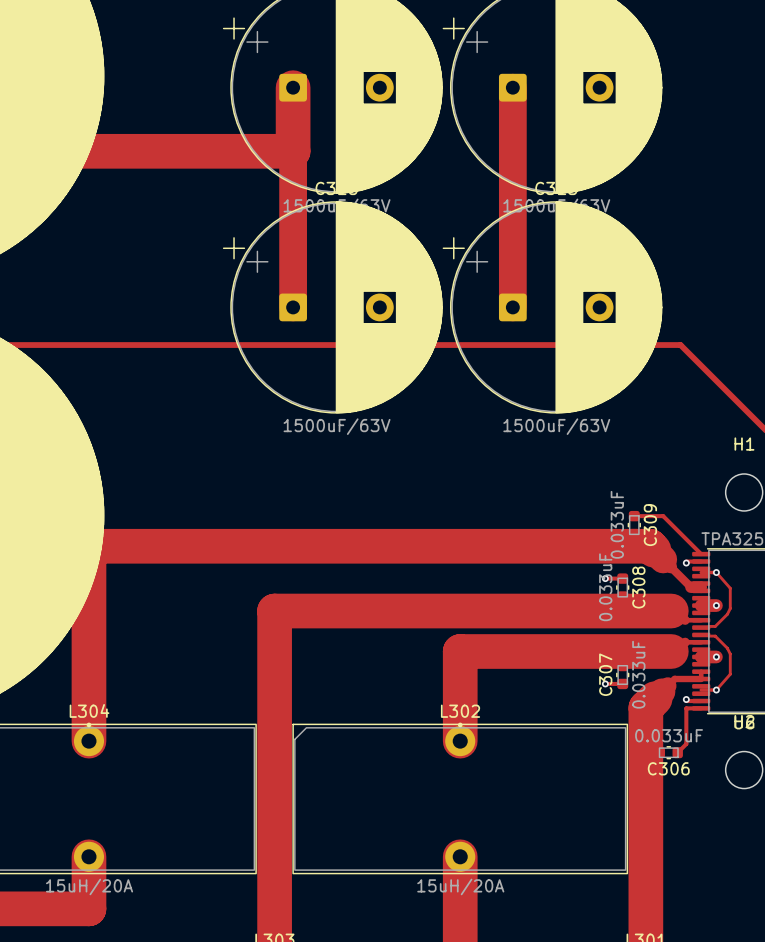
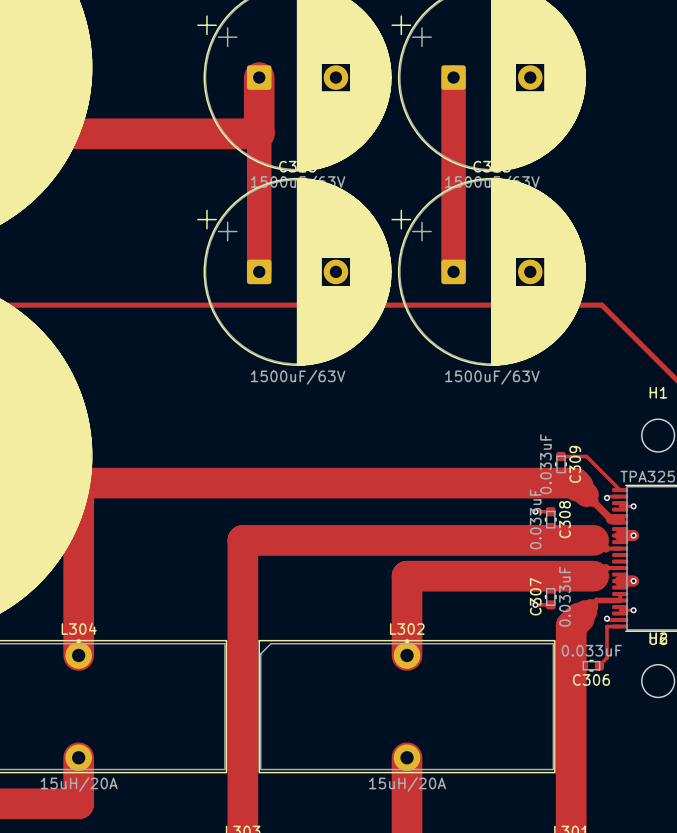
track: (716, 572) (730, 588) (730, 608) (727, 614) (715, 626) (708, 626) -> none
track: (708, 636) (715, 636) (727, 648) (730, 654) (730, 674) (716, 690) -> none

